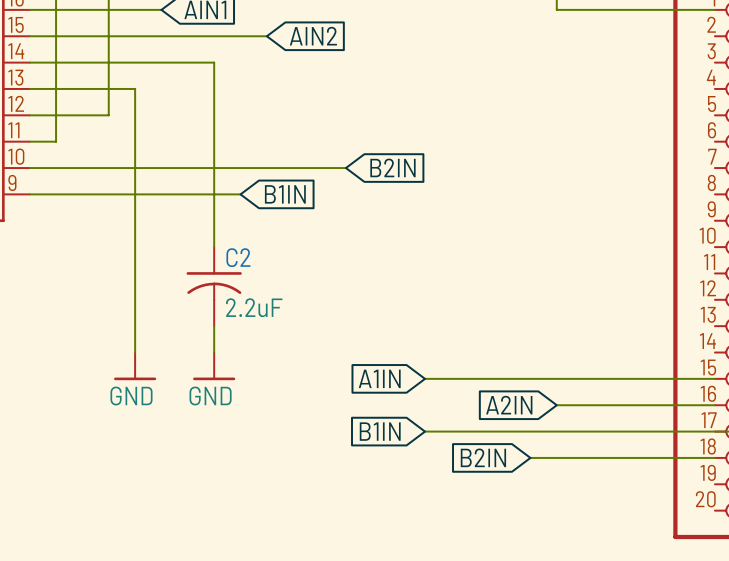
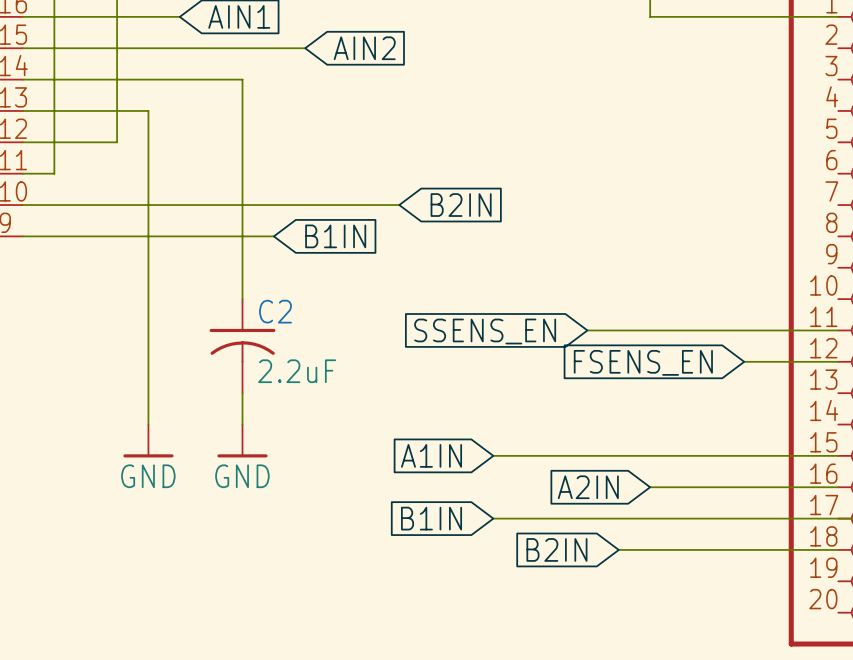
global label: none -> SSENS_EN (485, 331)
wire: none -> (587, 330) (838, 330)
global label: none -> FSENS_EN (643, 362)
wire: none -> (744, 361) (838, 361)

